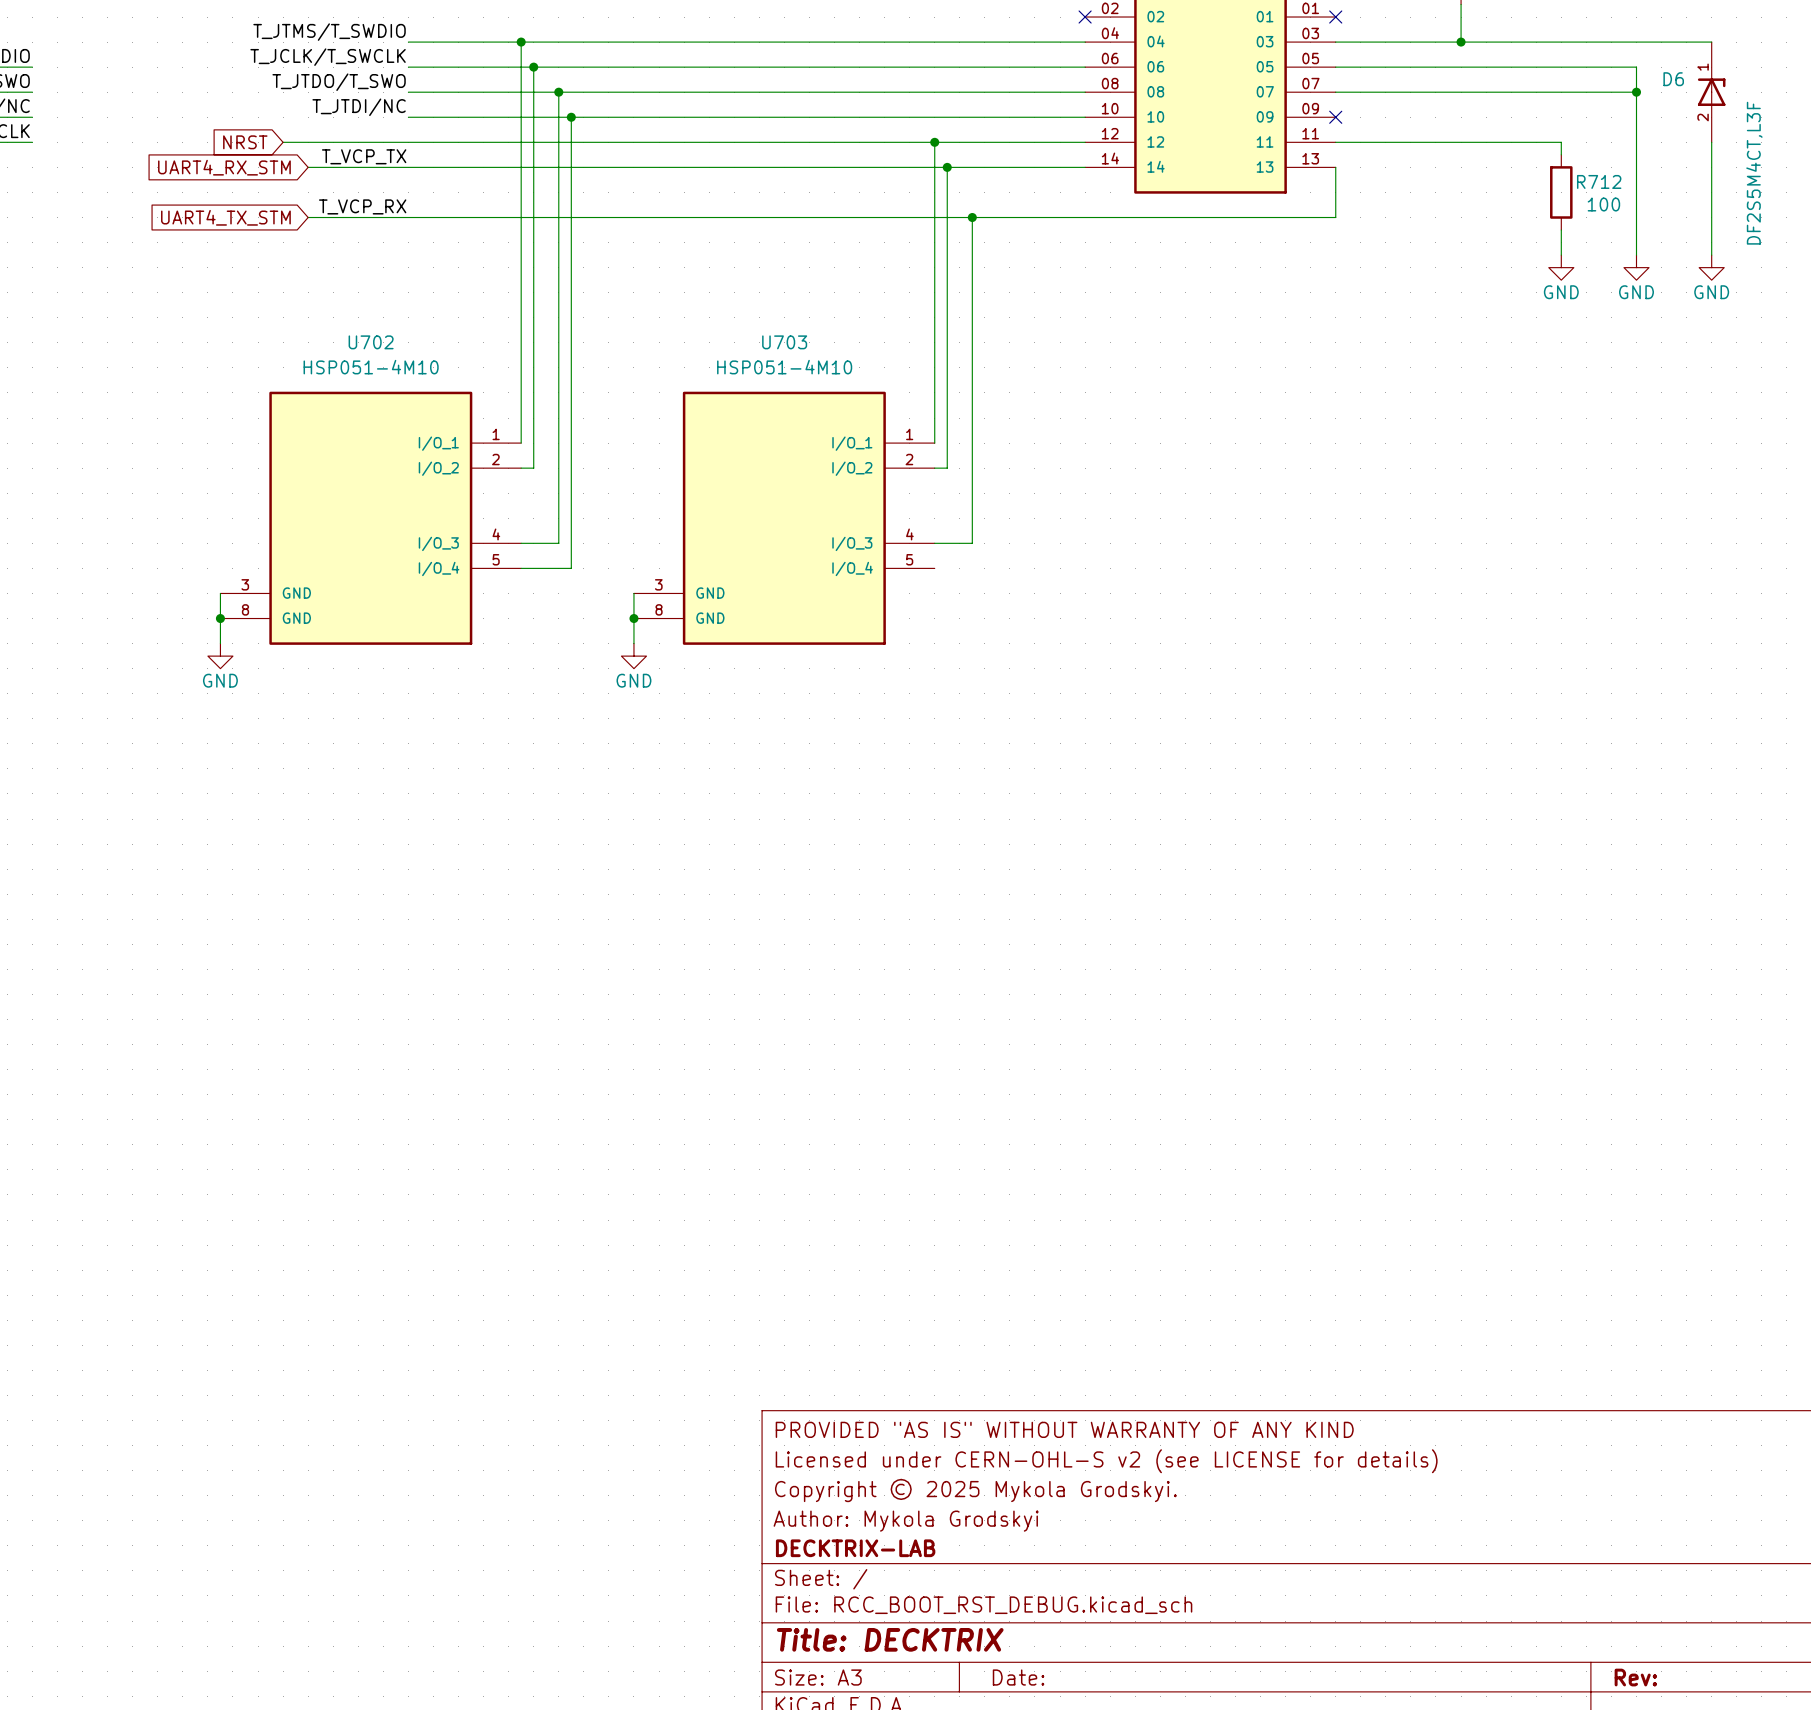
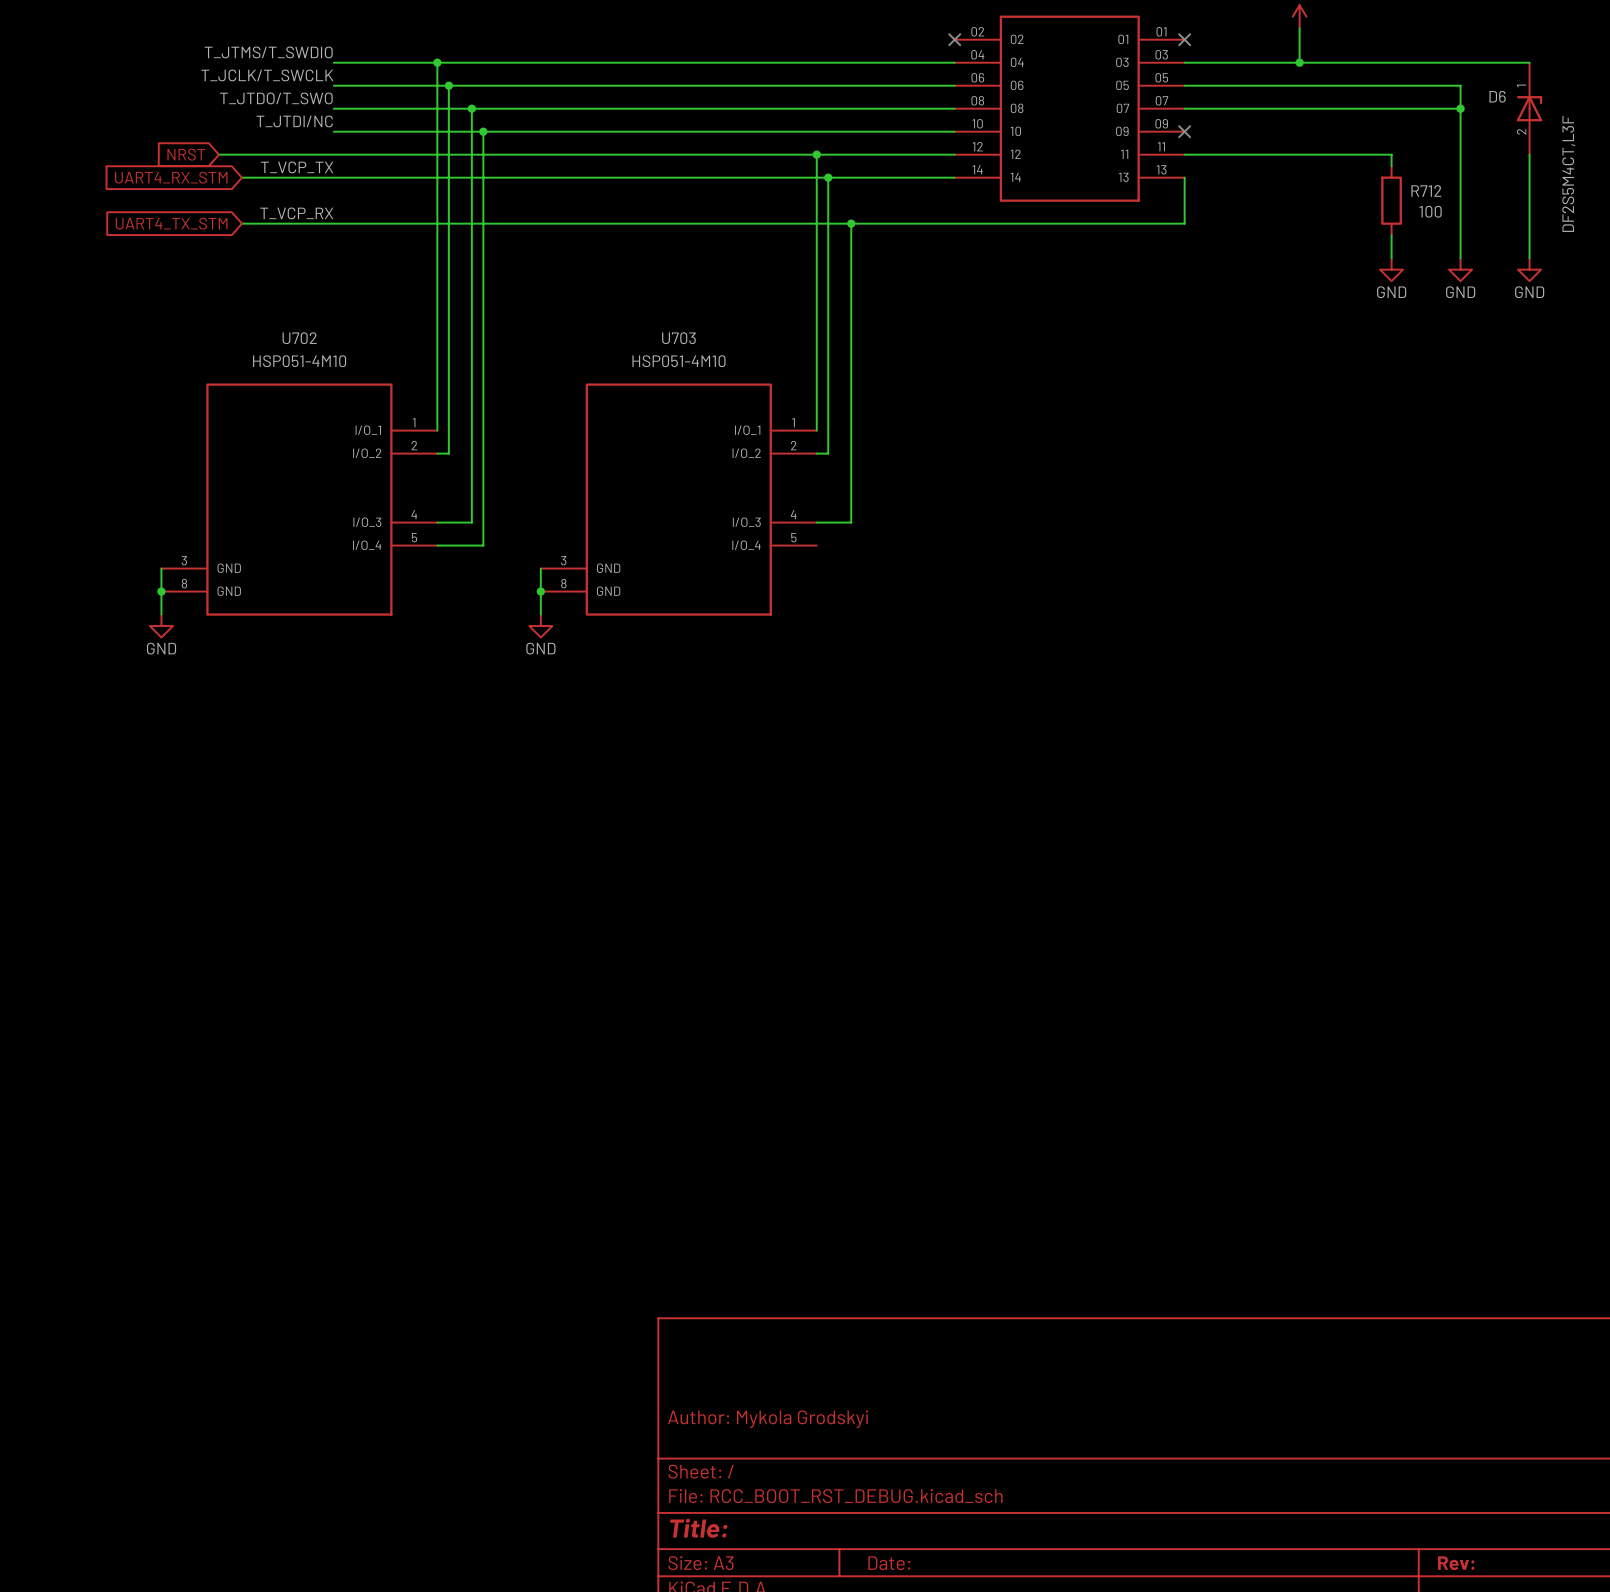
title block: PROVIDED "AS IS" WITHOUT WARRANTY OF ANY KIND (1064, 1429) -> none
title block: Licensed under CERN-OHL-S v2 (see LICENSE for details) (1106, 1461) -> none
title block: Copyright © 2025 Mykola Grodskyi. (975, 1490) -> none
title block: DECKTRIX-LAB (855, 1548) -> none
title block: Title: DECKTRIX (890, 1639) -> Title: (698, 1528)

